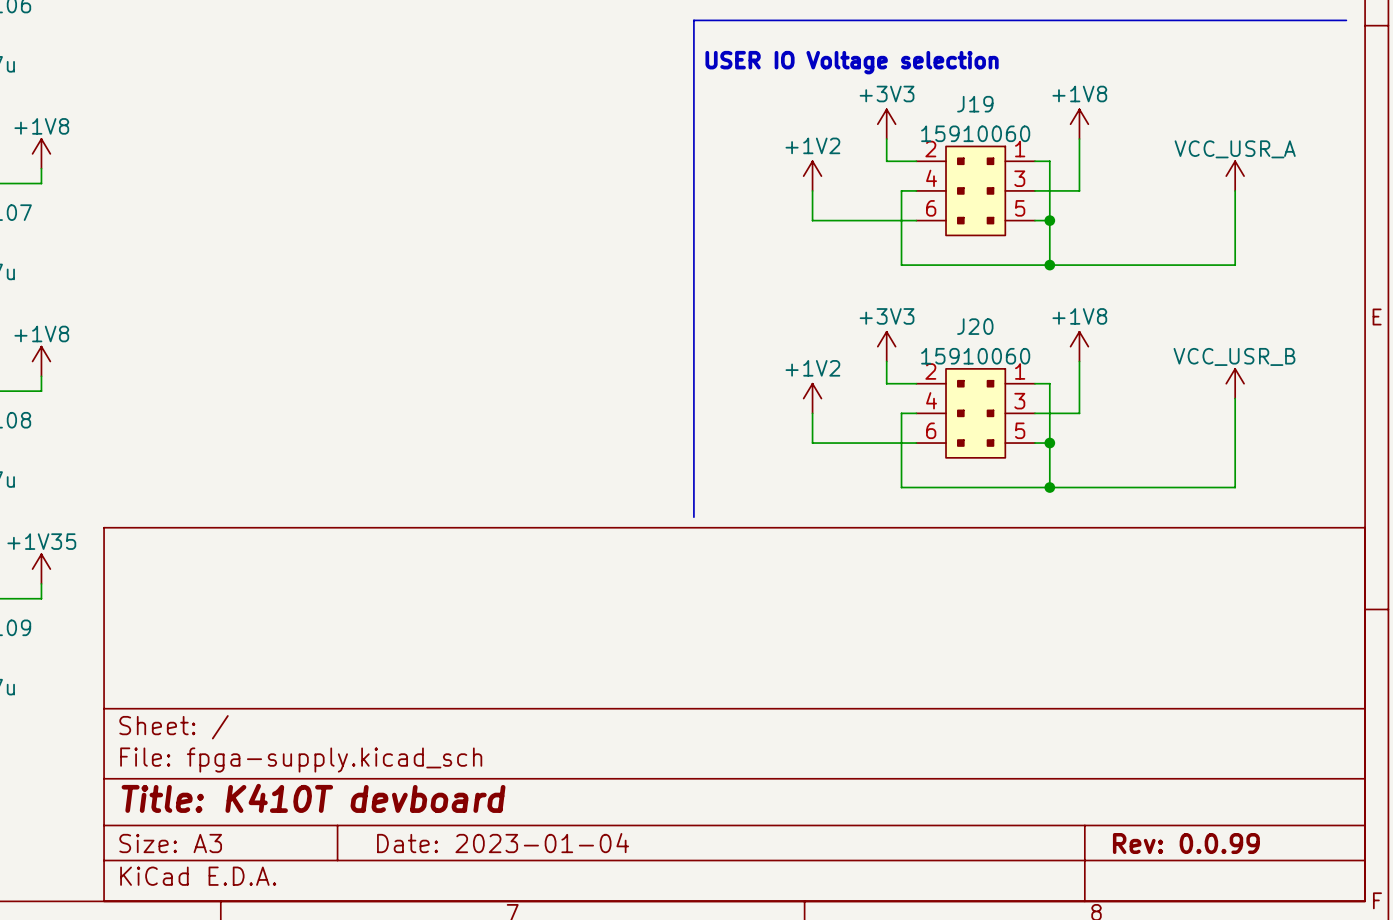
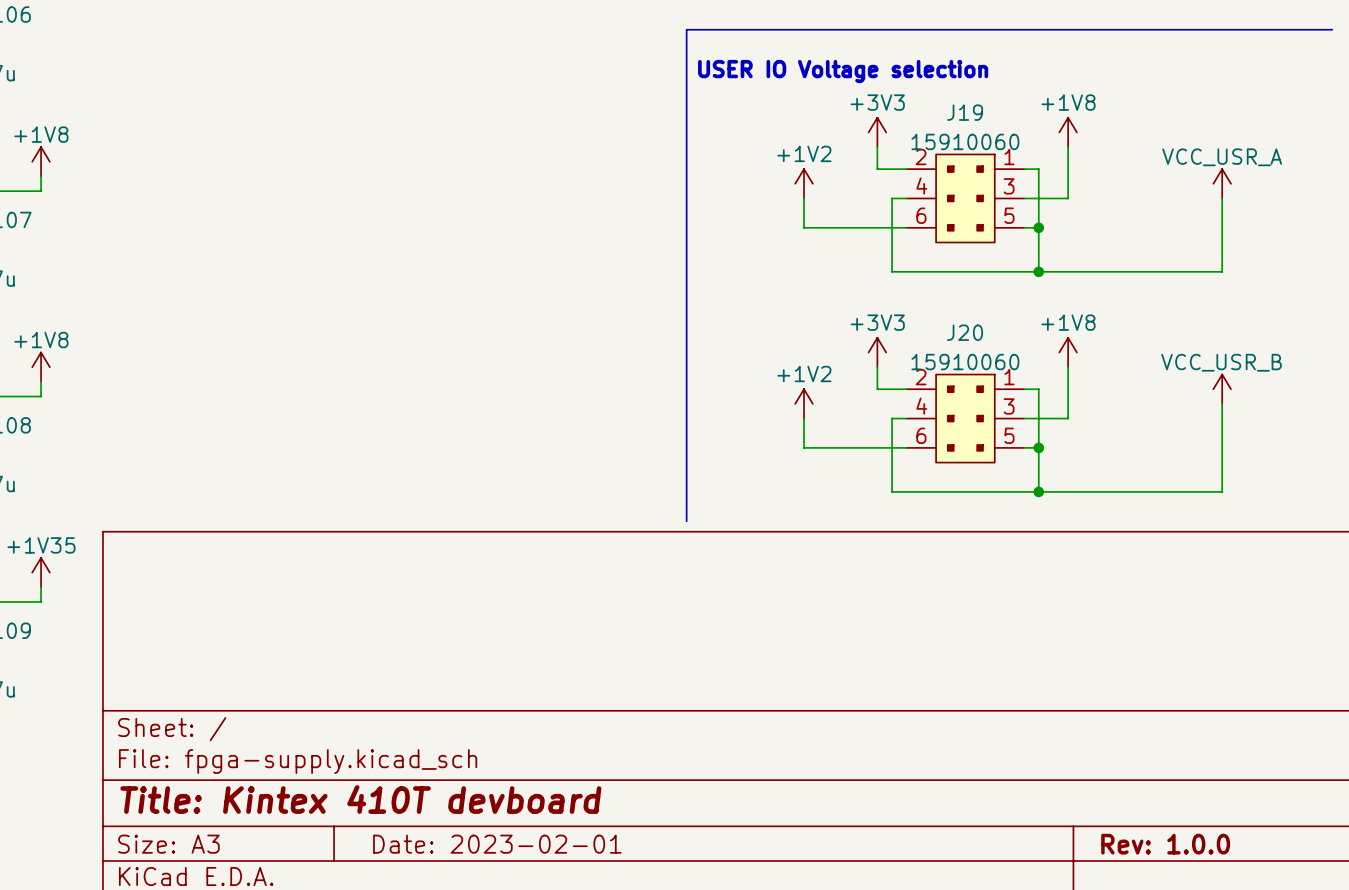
title block: Title: K410T devboard (313, 798) -> Title: Kintex 410T devboard (360, 799)
title block: Date: 2023-01-04 (503, 843) -> Date: 2023-02-01 (497, 844)
title block: Rev: 0.0.99 (1186, 843) -> Rev: 1.0.0 (1165, 844)

